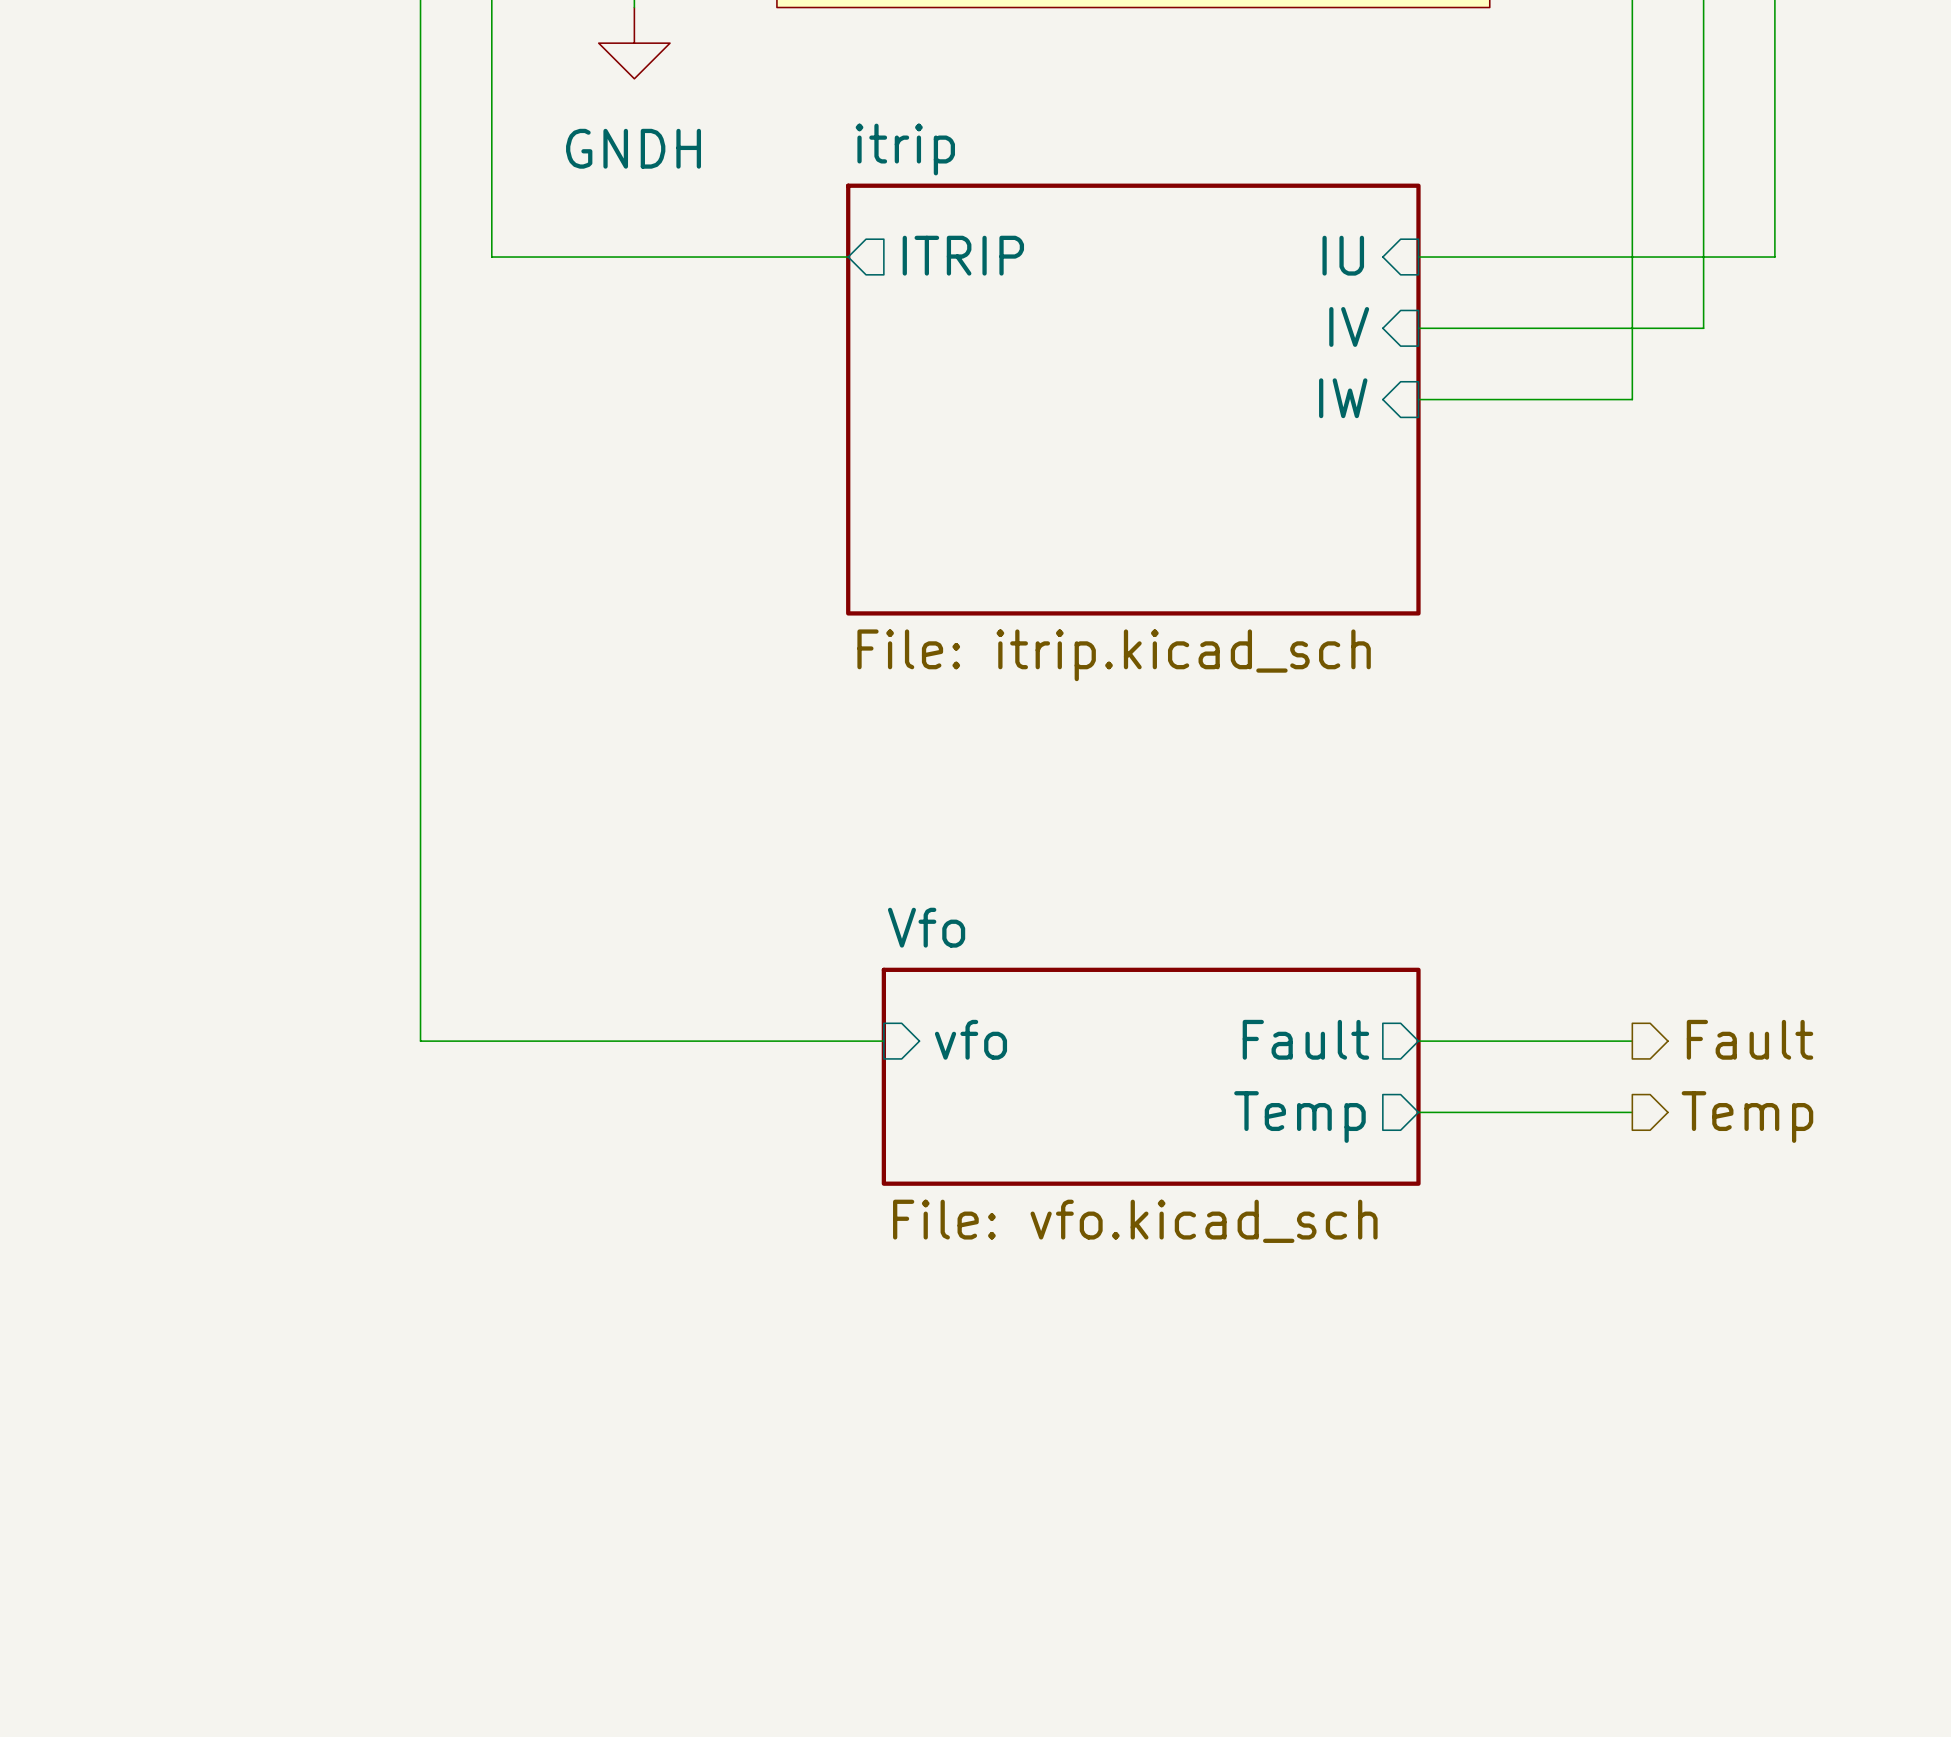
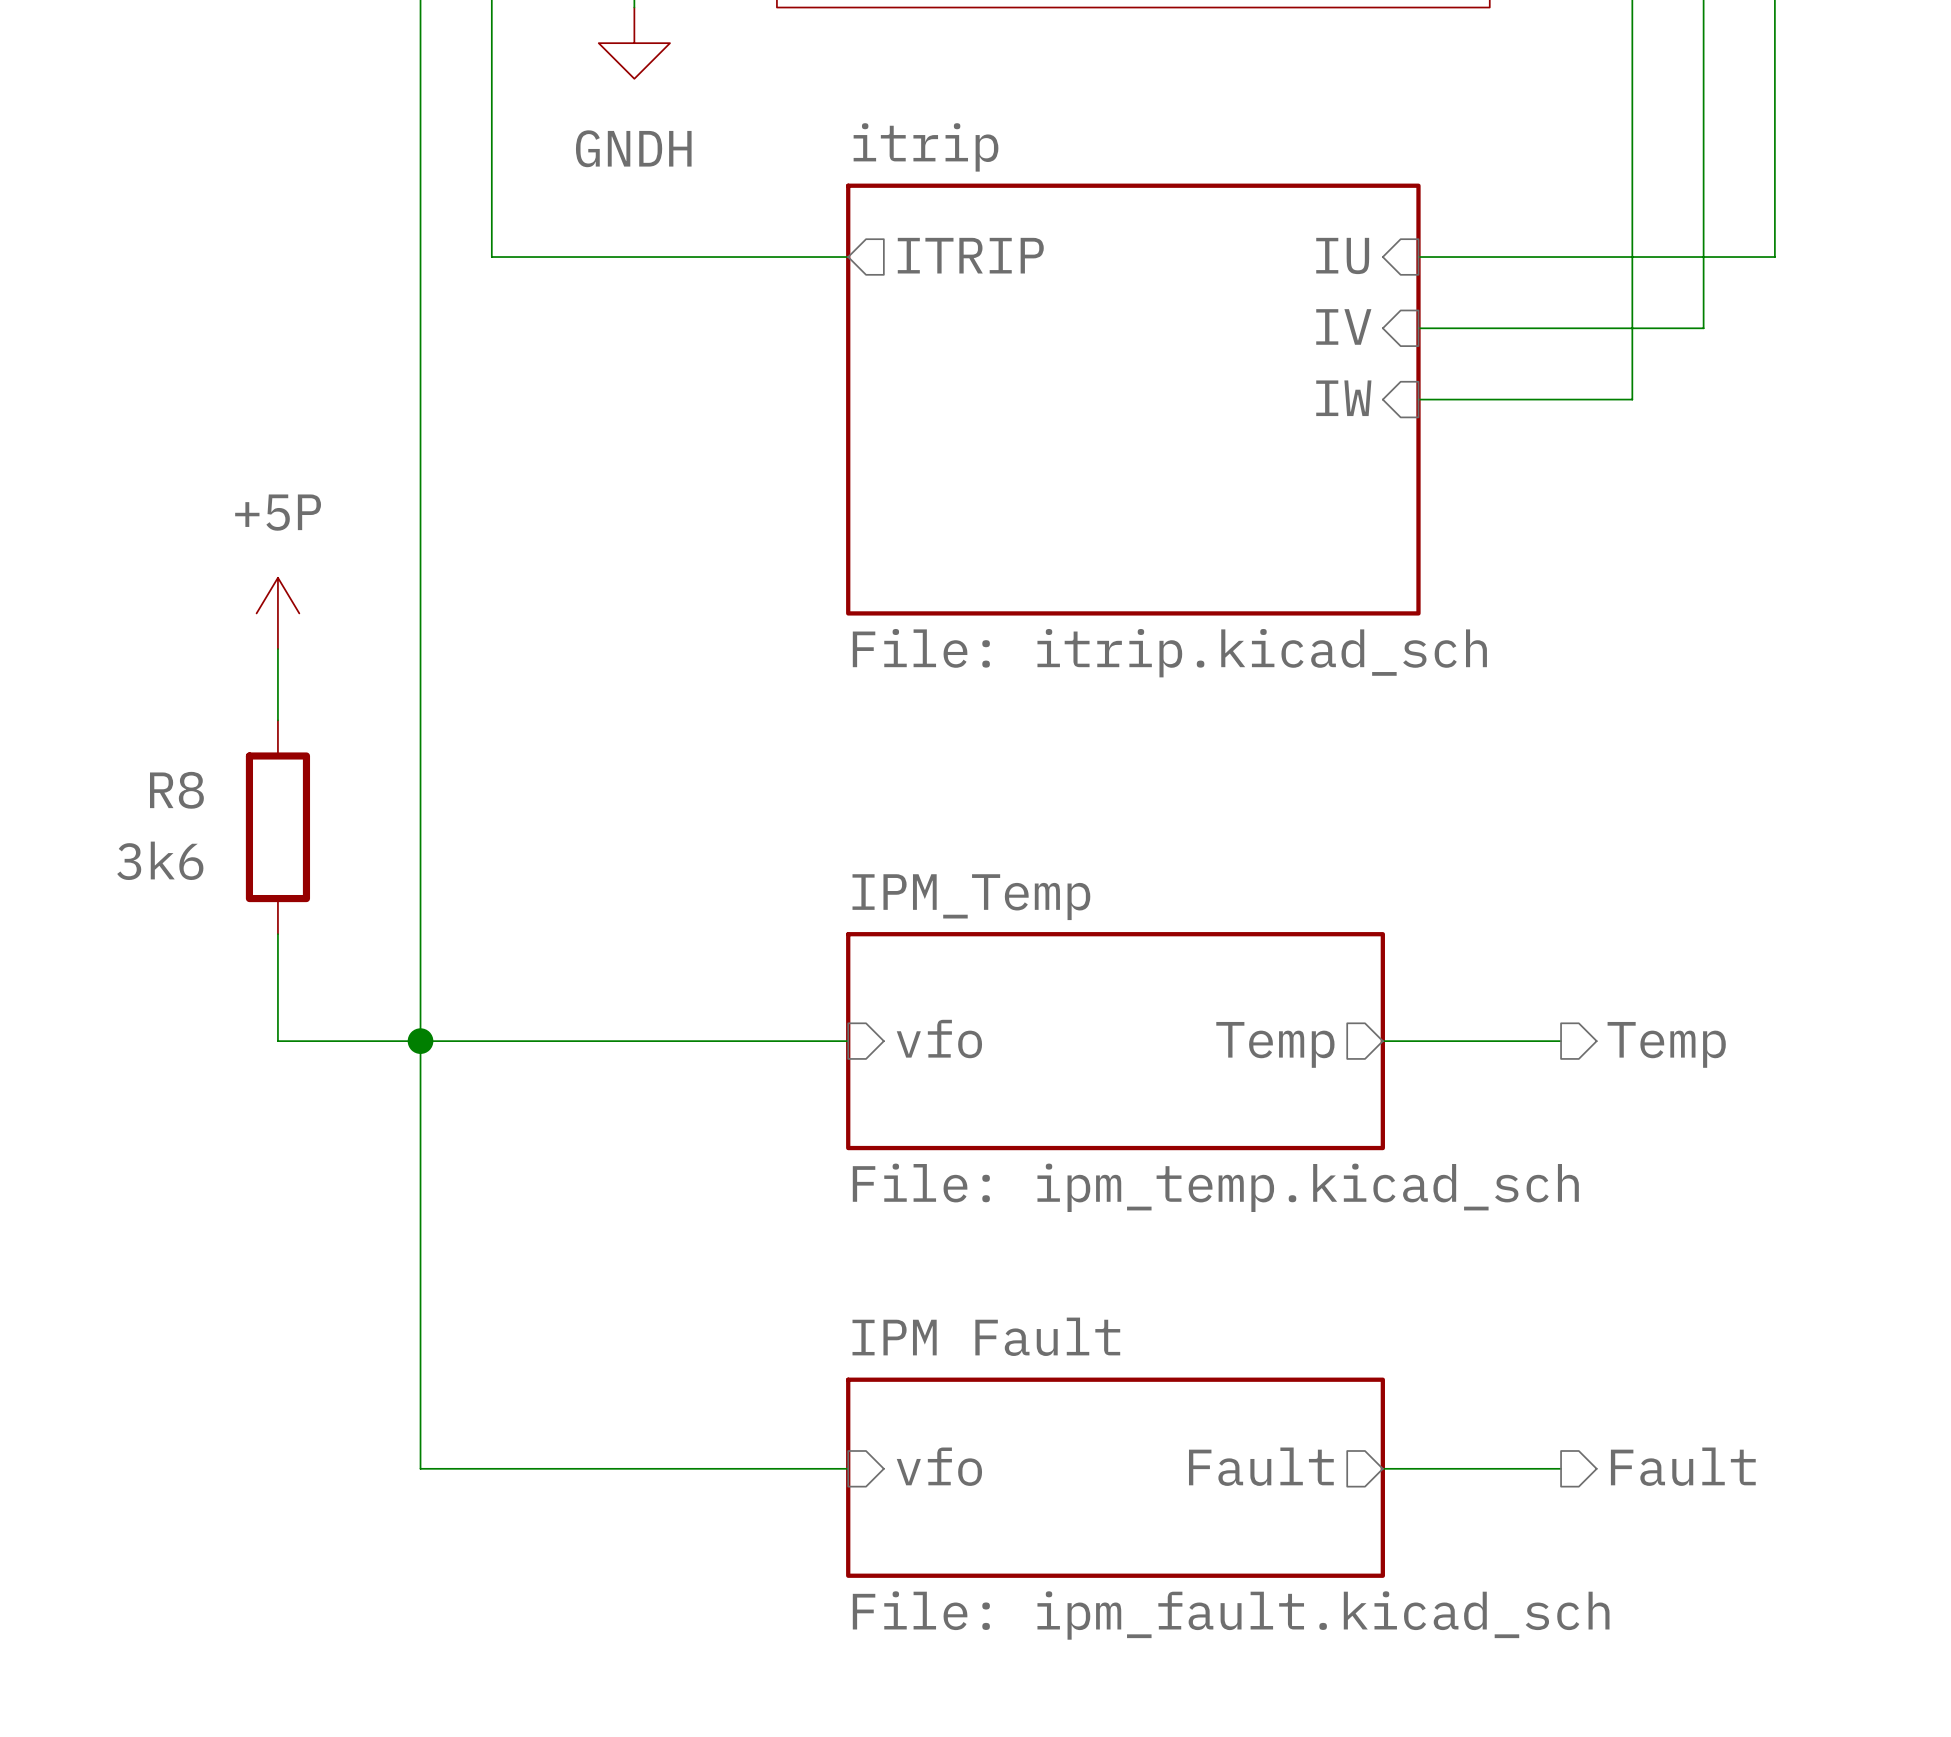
power symbol: none -> +5P (277, 613)
wire: none -> (277, 649) (277, 720)
R8: none -> 3k6 (277, 827)
wire: none -> (277, 934) (277, 1041) (420, 1041) (420, 1468) (848, 1468)
sheet pin position: vfo (970, 1039) -> vfo (939, 1039)
sheet pin position: Fault (1305, 1039) -> Fault (1261, 1466)
hierarchical label position: Fault (1749, 1039) -> Fault (1683, 1466)
junction: none -> (420, 1041)
wire: (848, 1041) (883, 1041) -> (1382, 1041) (1418, 1041)
sheet IPM_Temp: none -> File: ipm_temp.kicad_sch (1115, 1041)
wire: (1561, 1041) (1632, 1041) -> none
sheet Vfo: File: vfo.kicad_sch (1151, 1076) -> none
wire: (1418, 1112) (1632, 1112) -> none
sheet pin position: Temp (1299, 1117) -> Temp (1275, 1044)
hierarchical label position: Temp (1747, 1117) -> Temp (1666, 1044)
sheet pin: none -> vfo (939, 1466)
wire: none -> (1382, 1468) (1561, 1468)
sheet IPM Fault: none -> File: ipm_fault.kicad_sch (1115, 1477)

